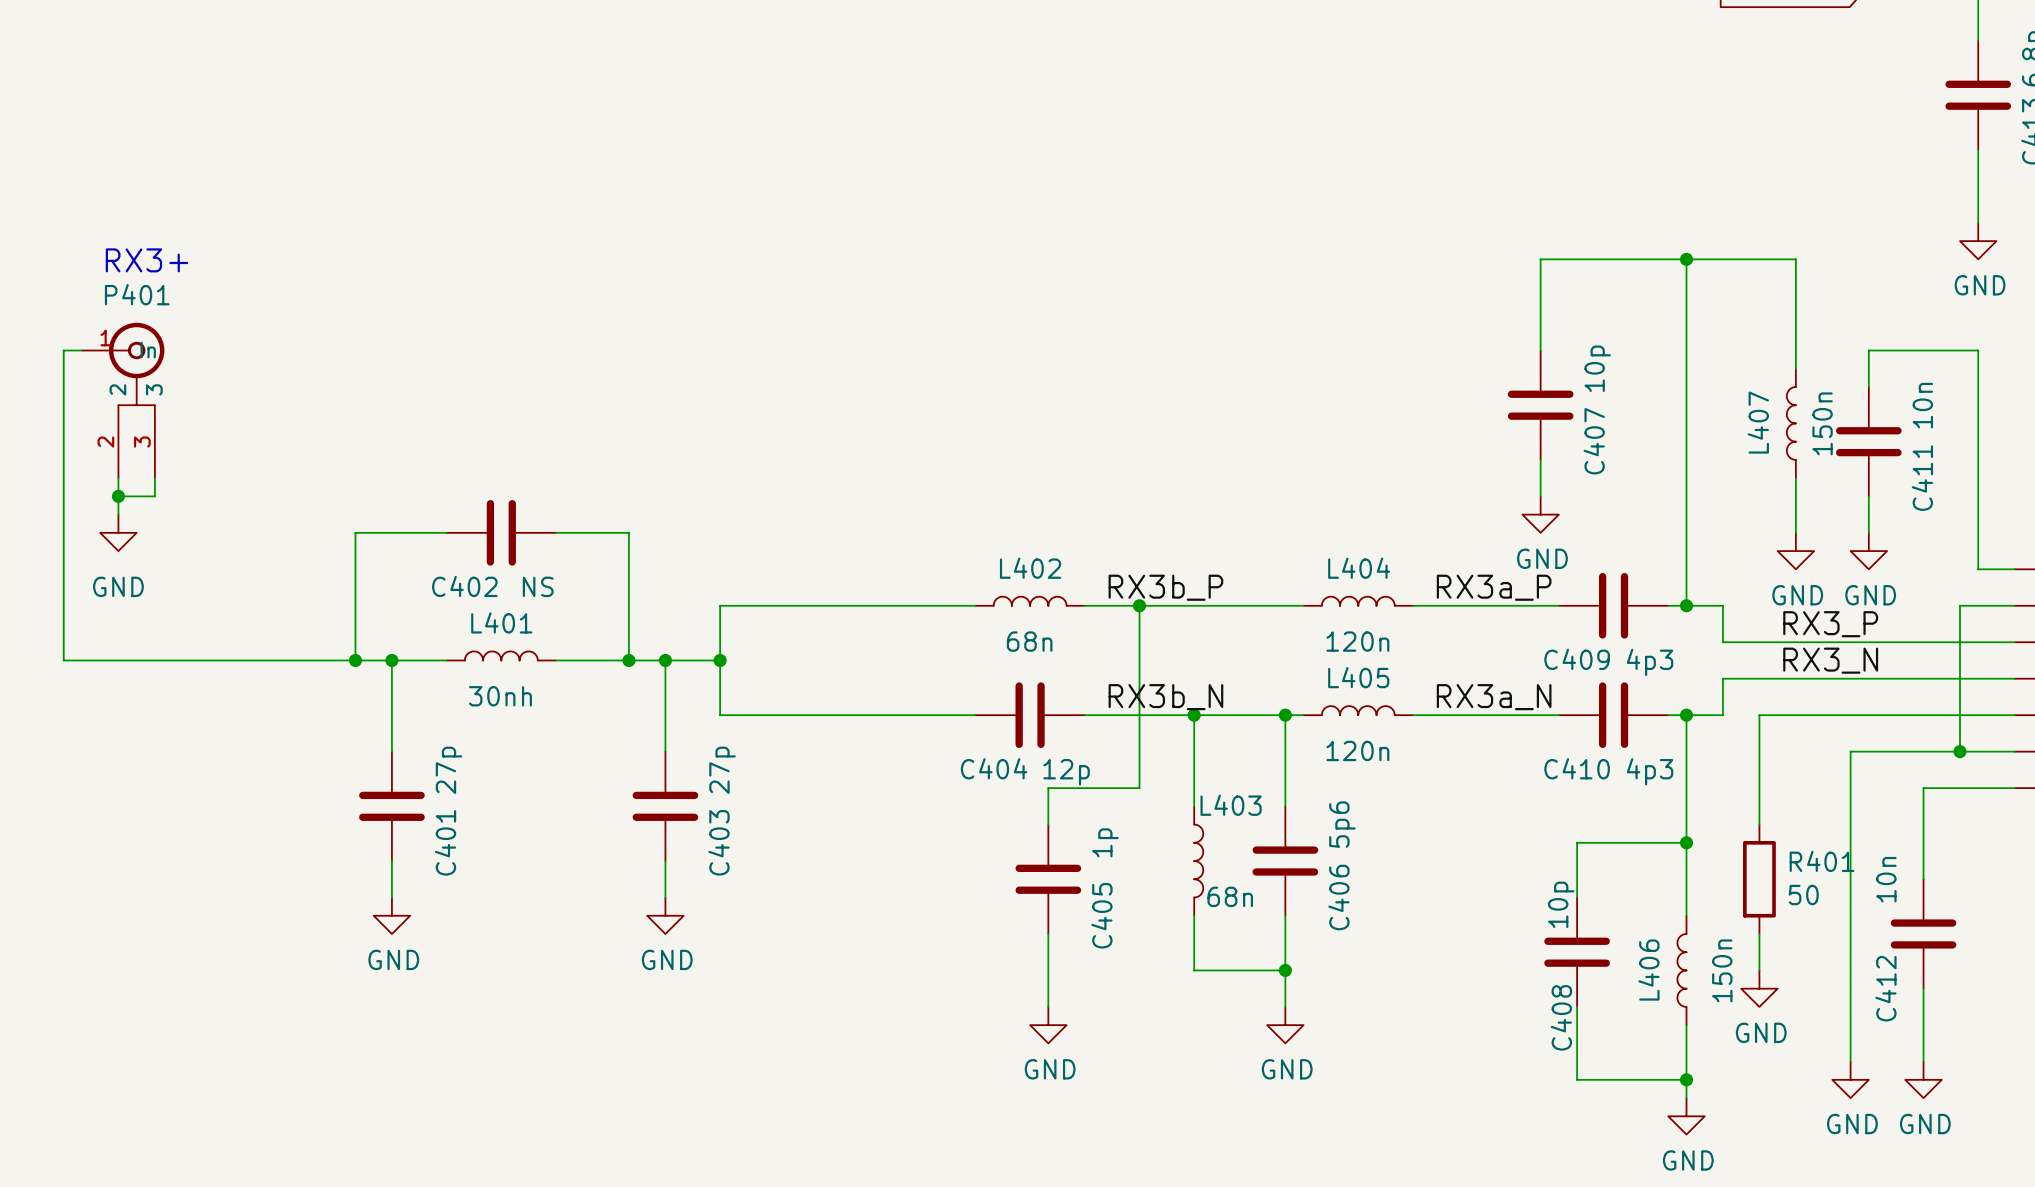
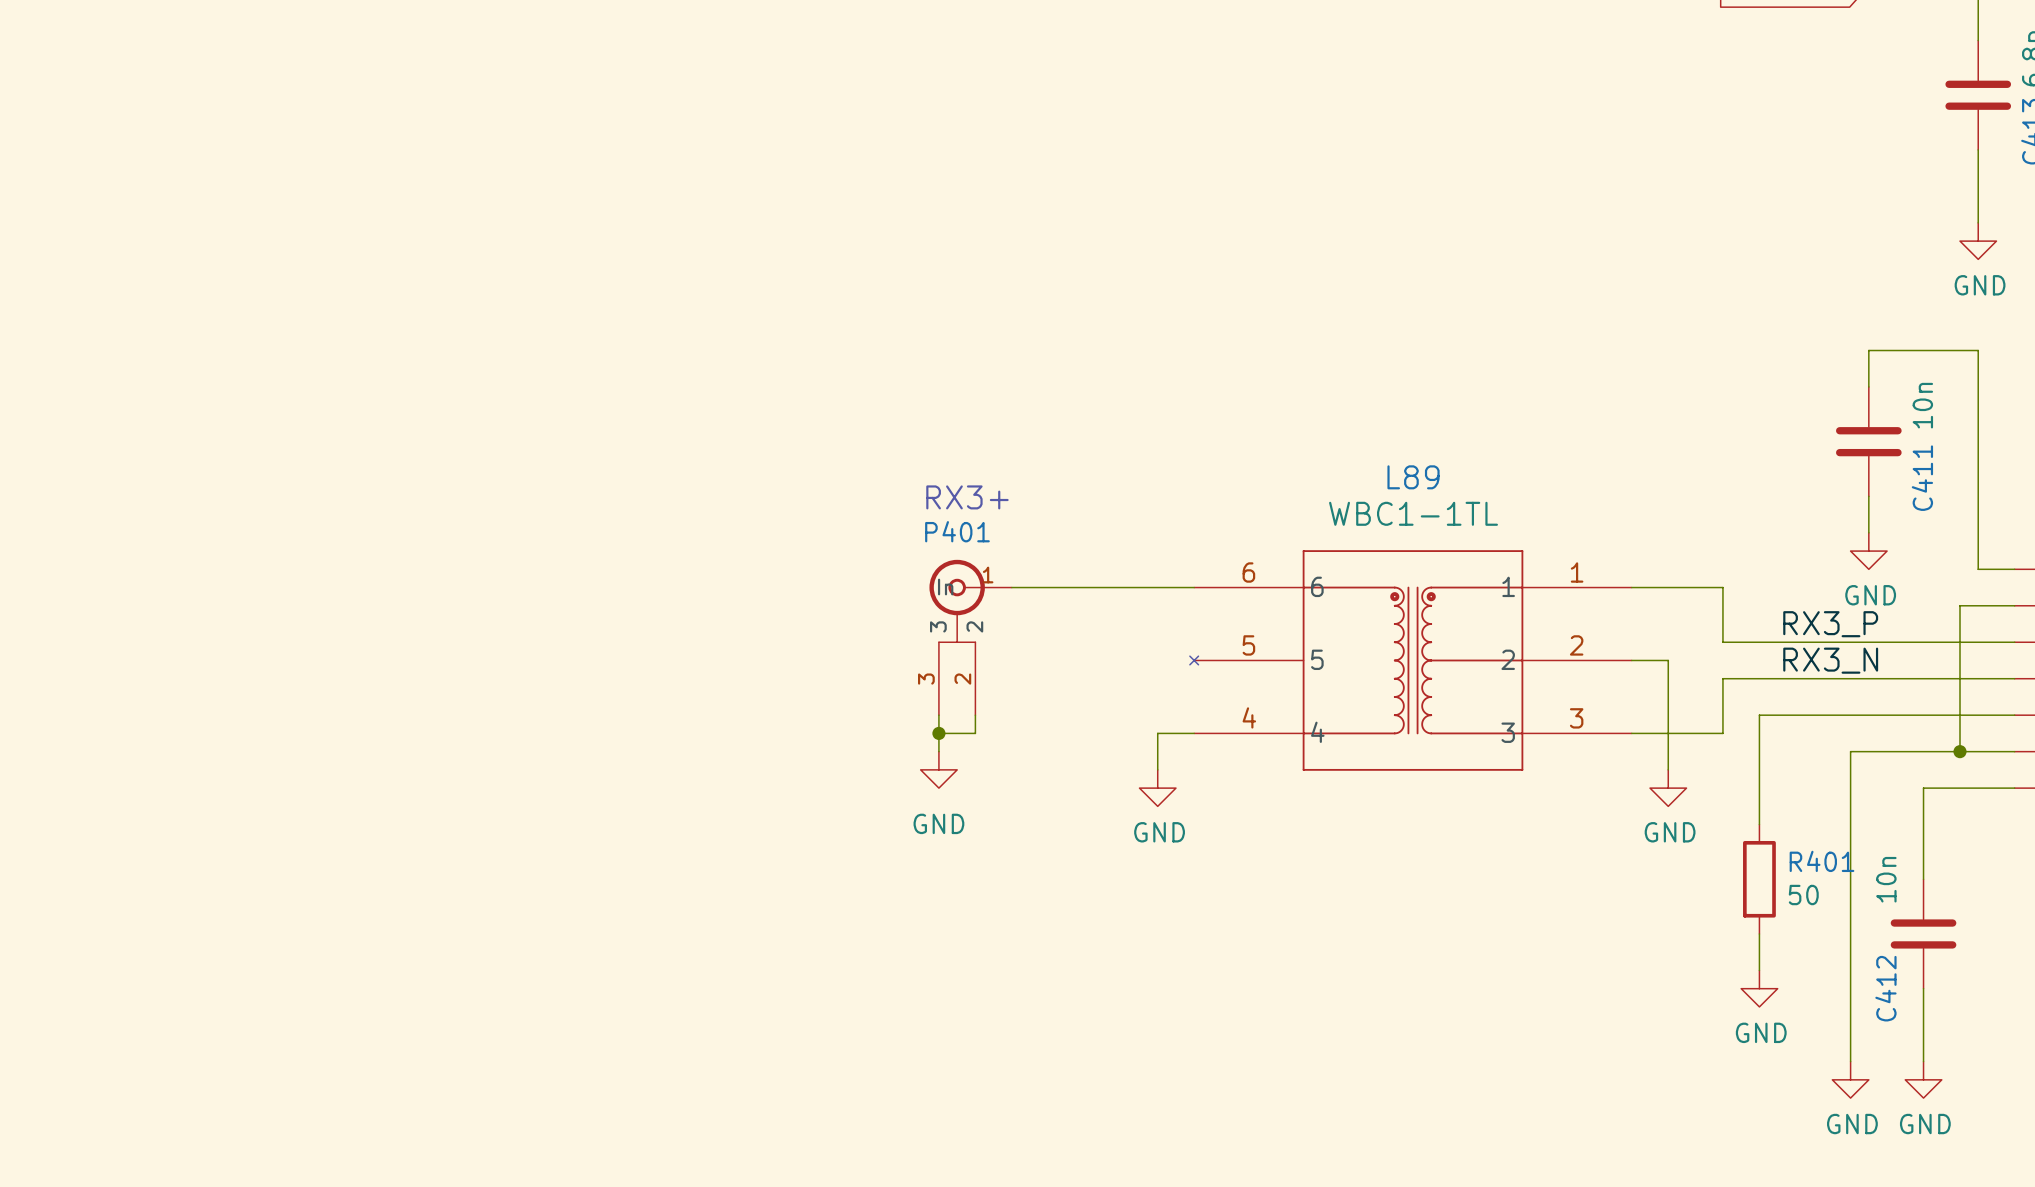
wire: (1686, 259) (1686, 605) -> none
junction: (1686, 259) -> none
text: RX3+ (146, 260) -> none
wire: (81, 350) (63, 350) (63, 660) (446, 660) -> none
wire: (1540, 350) (1540, 259) (1795, 259) (1795, 368) -> none
P401 flip: as is (136, 364) -> left-right (957, 601)
P401 position: (123, 400) -> (970, 637)
C407: 10p (1540, 405) -> none
L407: 150n (1791, 423) -> none
wire: (1540, 459) (1540, 496) -> none
wire: (118, 478) (118, 514) -> none
wire: (154, 478) (154, 496) (118, 496) -> none
wire: (1795, 478) (1795, 532) -> none
junction: (118, 496) -> none
text: none -> RX3+ (967, 497)
power symbol: GND (1540, 514) -> none
power symbol: GND (118, 532) -> none
wire: (446, 532) (355, 532) (355, 660) -> none
C402: NS (501, 532) -> none
wire: (556, 532) (628, 532) (628, 660) -> none
power symbol: GND (1795, 551) -> none
wire: none -> (1011, 587) (1194, 587)
label: RX3b_P (1165, 587) -> none
label: RX3a_P (1494, 587) -> none
L402: 68n (1030, 601) -> none
L404: 120n (1358, 601) -> none
wire: (975, 605) (720, 605) (720, 715) (975, 715) -> (938, 733) (975, 733) (975, 715)
wire: (1084, 605) (1303, 605) -> none
wire: (1139, 605) (1139, 788) (1048, 788) (1048, 824) -> none
junction: (1139, 605) -> none
wire: (1413, 605) (1558, 605) -> none
C409: 4p3 (1613, 605) -> none
wire: (1668, 605) (1722, 605) -> (1631, 587) (1722, 587) (1722, 605)
junction: (1686, 605) -> none
L401: 30nh (501, 655) -> none
junction: (355, 660) -> none
wire: (391, 660) (391, 751) -> none
junction: (391, 660) -> none
wire: (556, 660) (720, 660) -> none
junction: (628, 660) -> none
wire: (665, 660) (665, 751) -> none
junction: (665, 660) -> none
junction: (720, 660) -> none
L89: none -> WBC1-1TL (1410, 660)
wire: none -> (1631, 660) (1668, 660) (1668, 769)
label: RX3b_N (1165, 697) -> none
label: RX3a_N (1494, 697) -> none
L405: 120n (1358, 710) -> none
C404: 12p (1030, 715) -> none
wire: (1084, 715) (1303, 715) -> none
wire: (1194, 715) (1194, 806) -> none
junction: (1194, 715) -> none
wire: (1285, 715) (1285, 806) -> none
junction: (1285, 715) -> none
wire: (1413, 715) (1558, 715) -> none
C410: 4p3 (1613, 715) -> none
wire: (1668, 715) (1722, 715) -> (1631, 733) (1722, 733) (1722, 715)
wire: (1686, 715) (1686, 915) -> none
junction: (1686, 715) -> none
junction: none -> (938, 733)
wire: none -> (1194, 733) (1157, 733) (1157, 769)
power symbol: none -> GND (938, 769)
power symbol: none -> GND (1157, 788)
power symbol: none -> GND (1668, 788)
C401: 27p (391, 806) -> none
C403: 27p (665, 806) -> none
wire: (1686, 842) (1577, 842) (1577, 897) -> none
junction: (1686, 842) -> none
wire: (391, 861) (391, 897) -> none
wire: (665, 861) (665, 897) -> (938, 715) (938, 751)
L403: 68n (1198, 861) -> none
C406: 5p6 (1285, 861) -> none
C405: 1p (1048, 879) -> none
power symbol: GND (391, 915) -> none
power symbol: GND (665, 915) -> none
wire: (1194, 915) (1194, 970) (1285, 970) -> none
wire: (1285, 915) (1285, 1006) -> none
wire: (1048, 933) (1048, 1006) -> none
C408: 10p (1577, 952) -> none
junction: (1285, 970) -> none
L406: 150n (1681, 970) -> none
wire: (1577, 1006) (1577, 1079) (1686, 1079) -> none
power symbol: GND (1048, 1025) -> none
power symbol: GND (1285, 1025) -> none
wire: (1686, 1025) (1686, 1098) -> none
junction: (1686, 1079) -> none
power symbol: GND (1686, 1116) -> none

